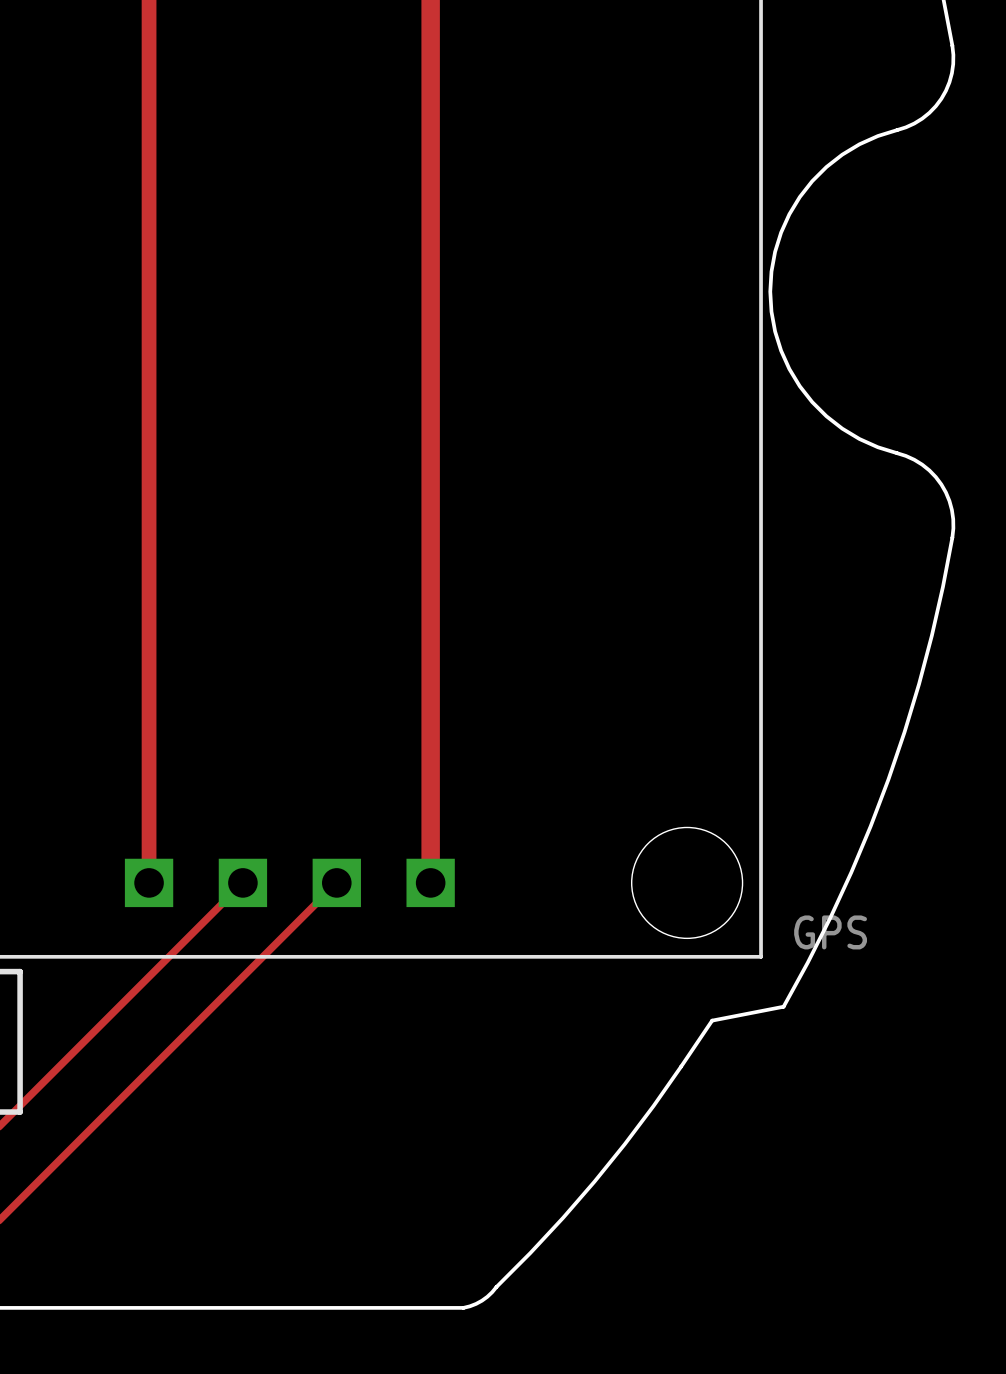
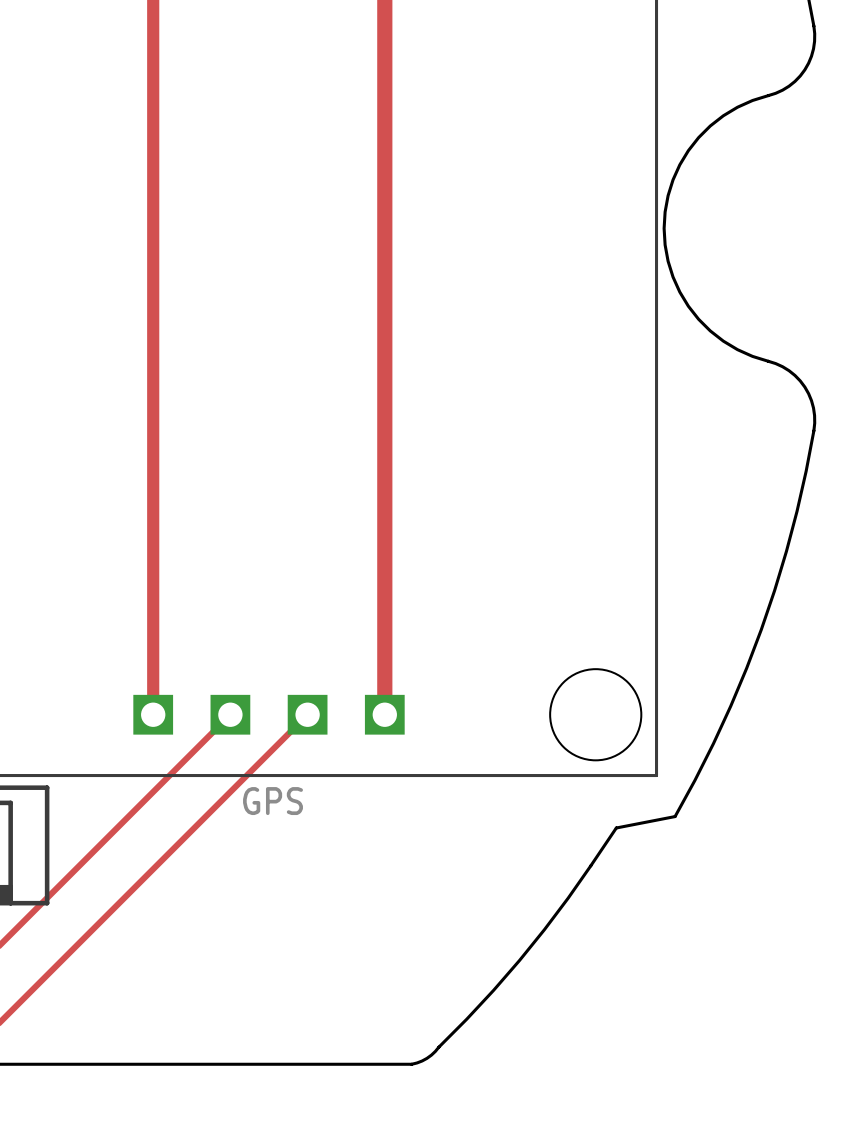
part value position: GPS (830, 932) -> GPS (273, 801)

